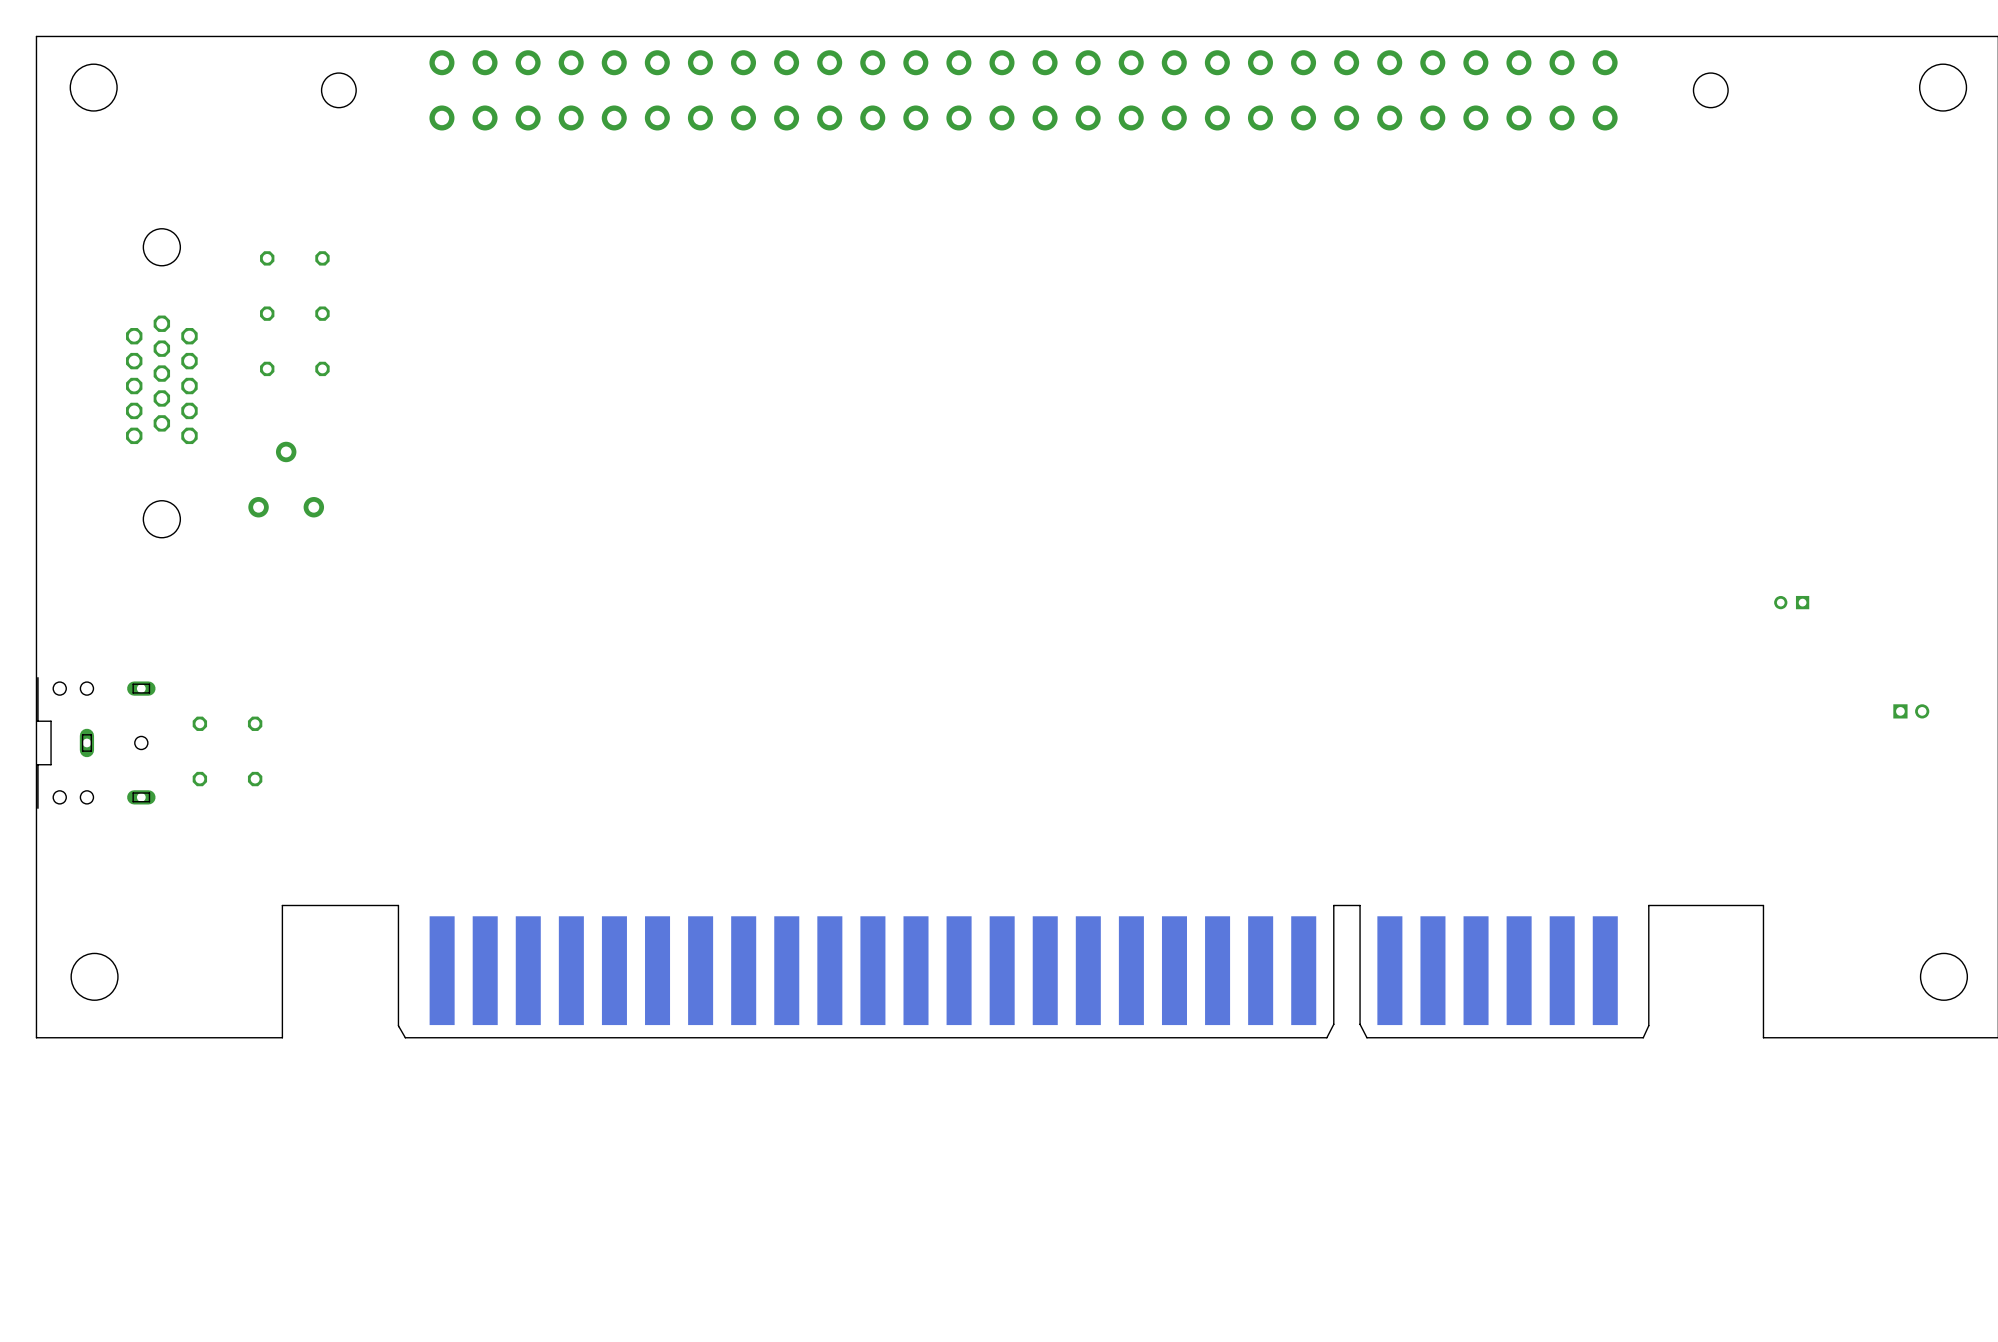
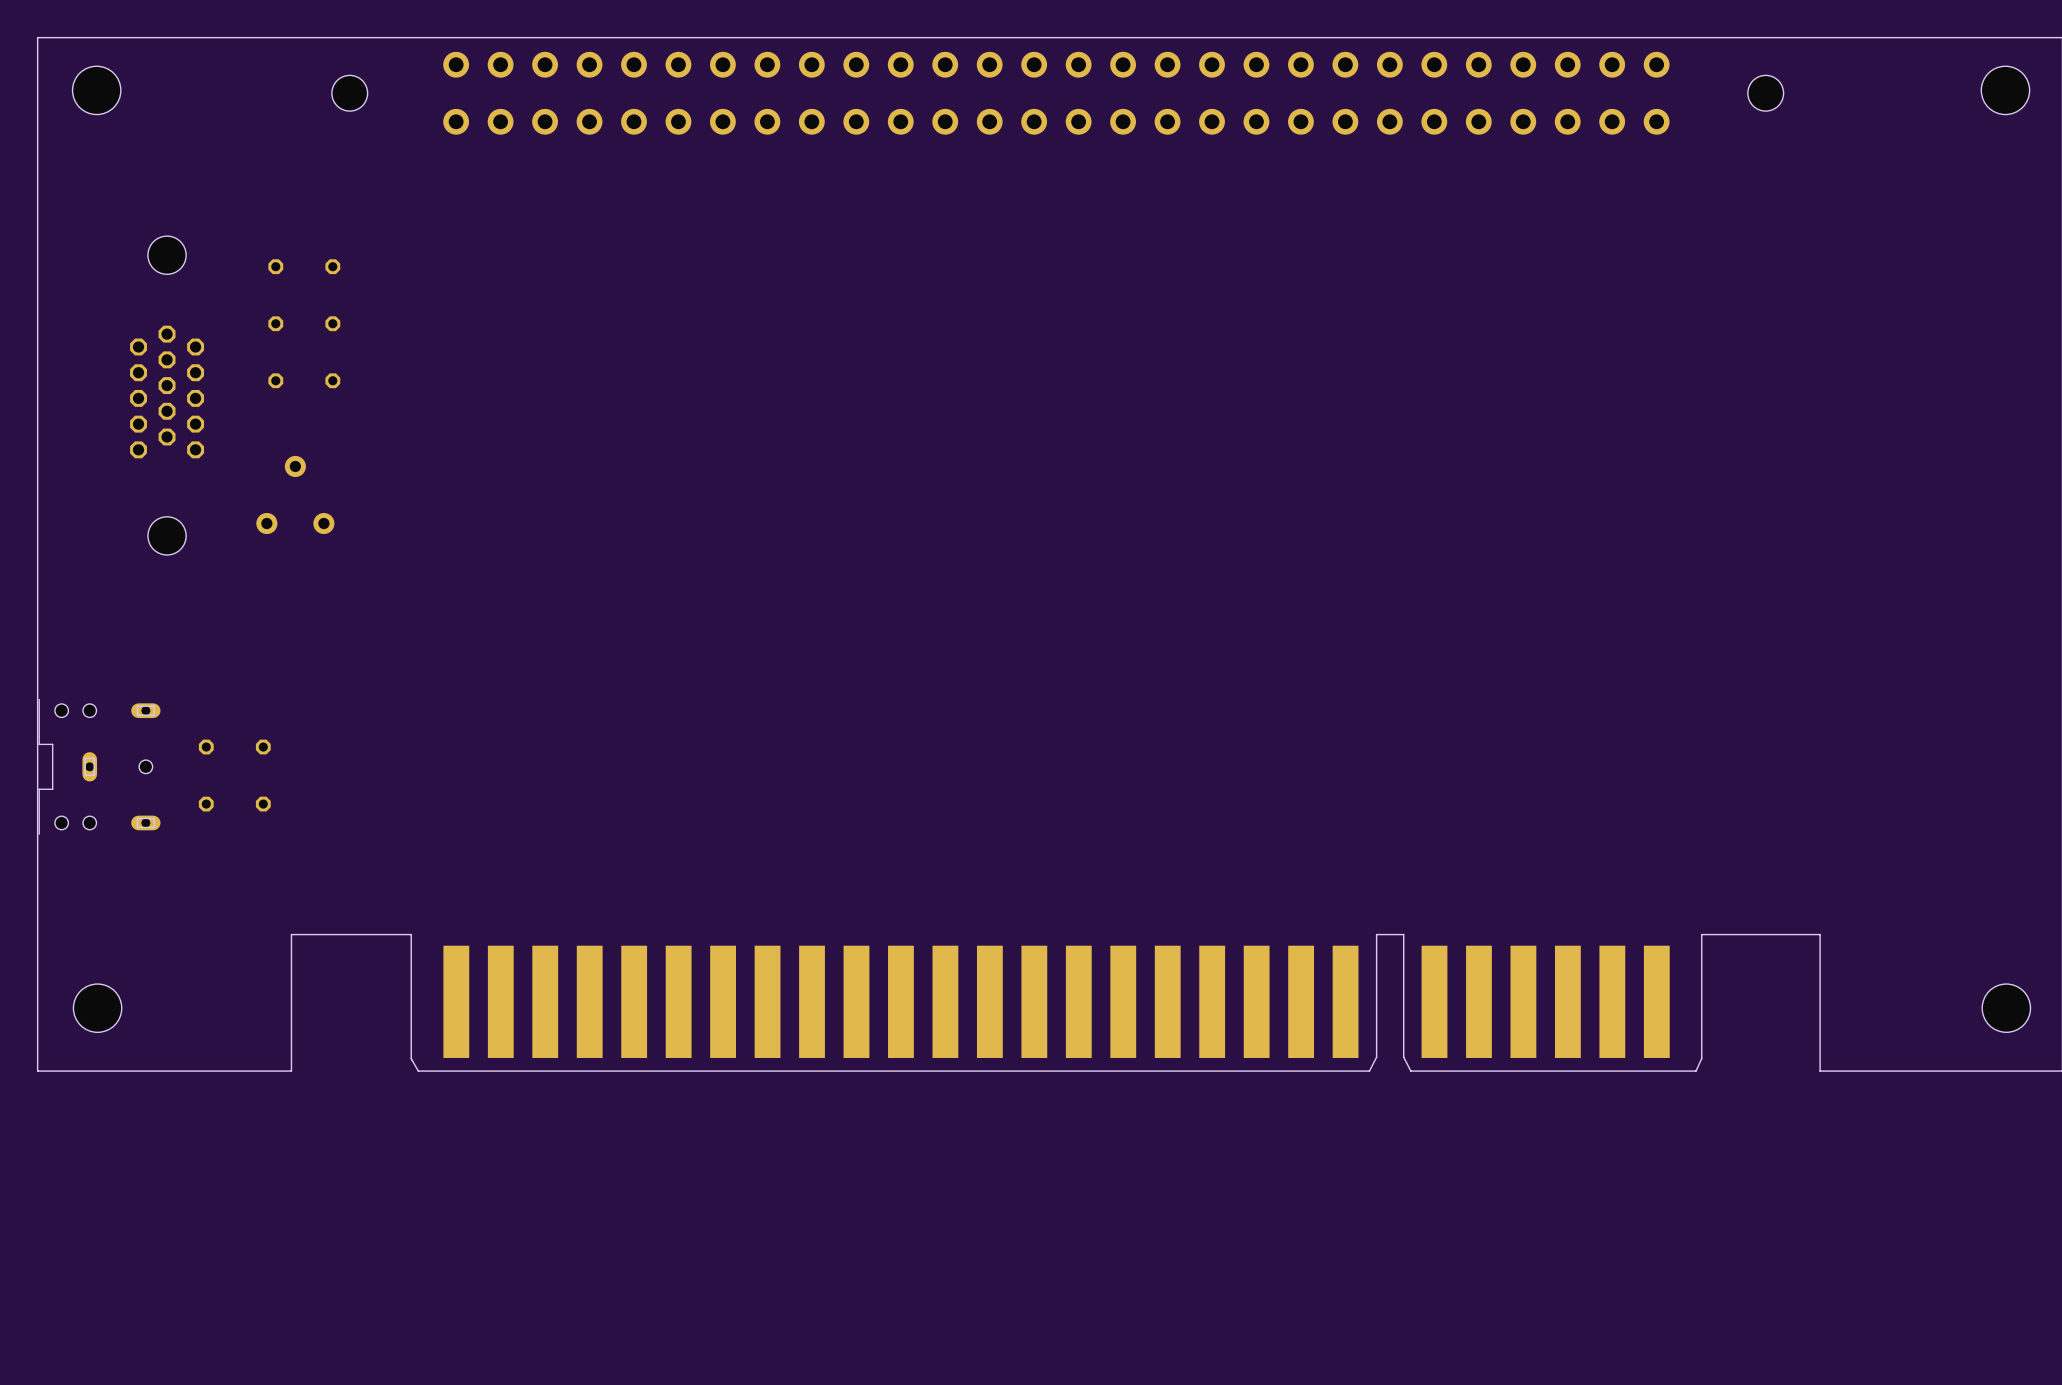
part: (1791, 602) -> none
part: (1911, 711) -> none

